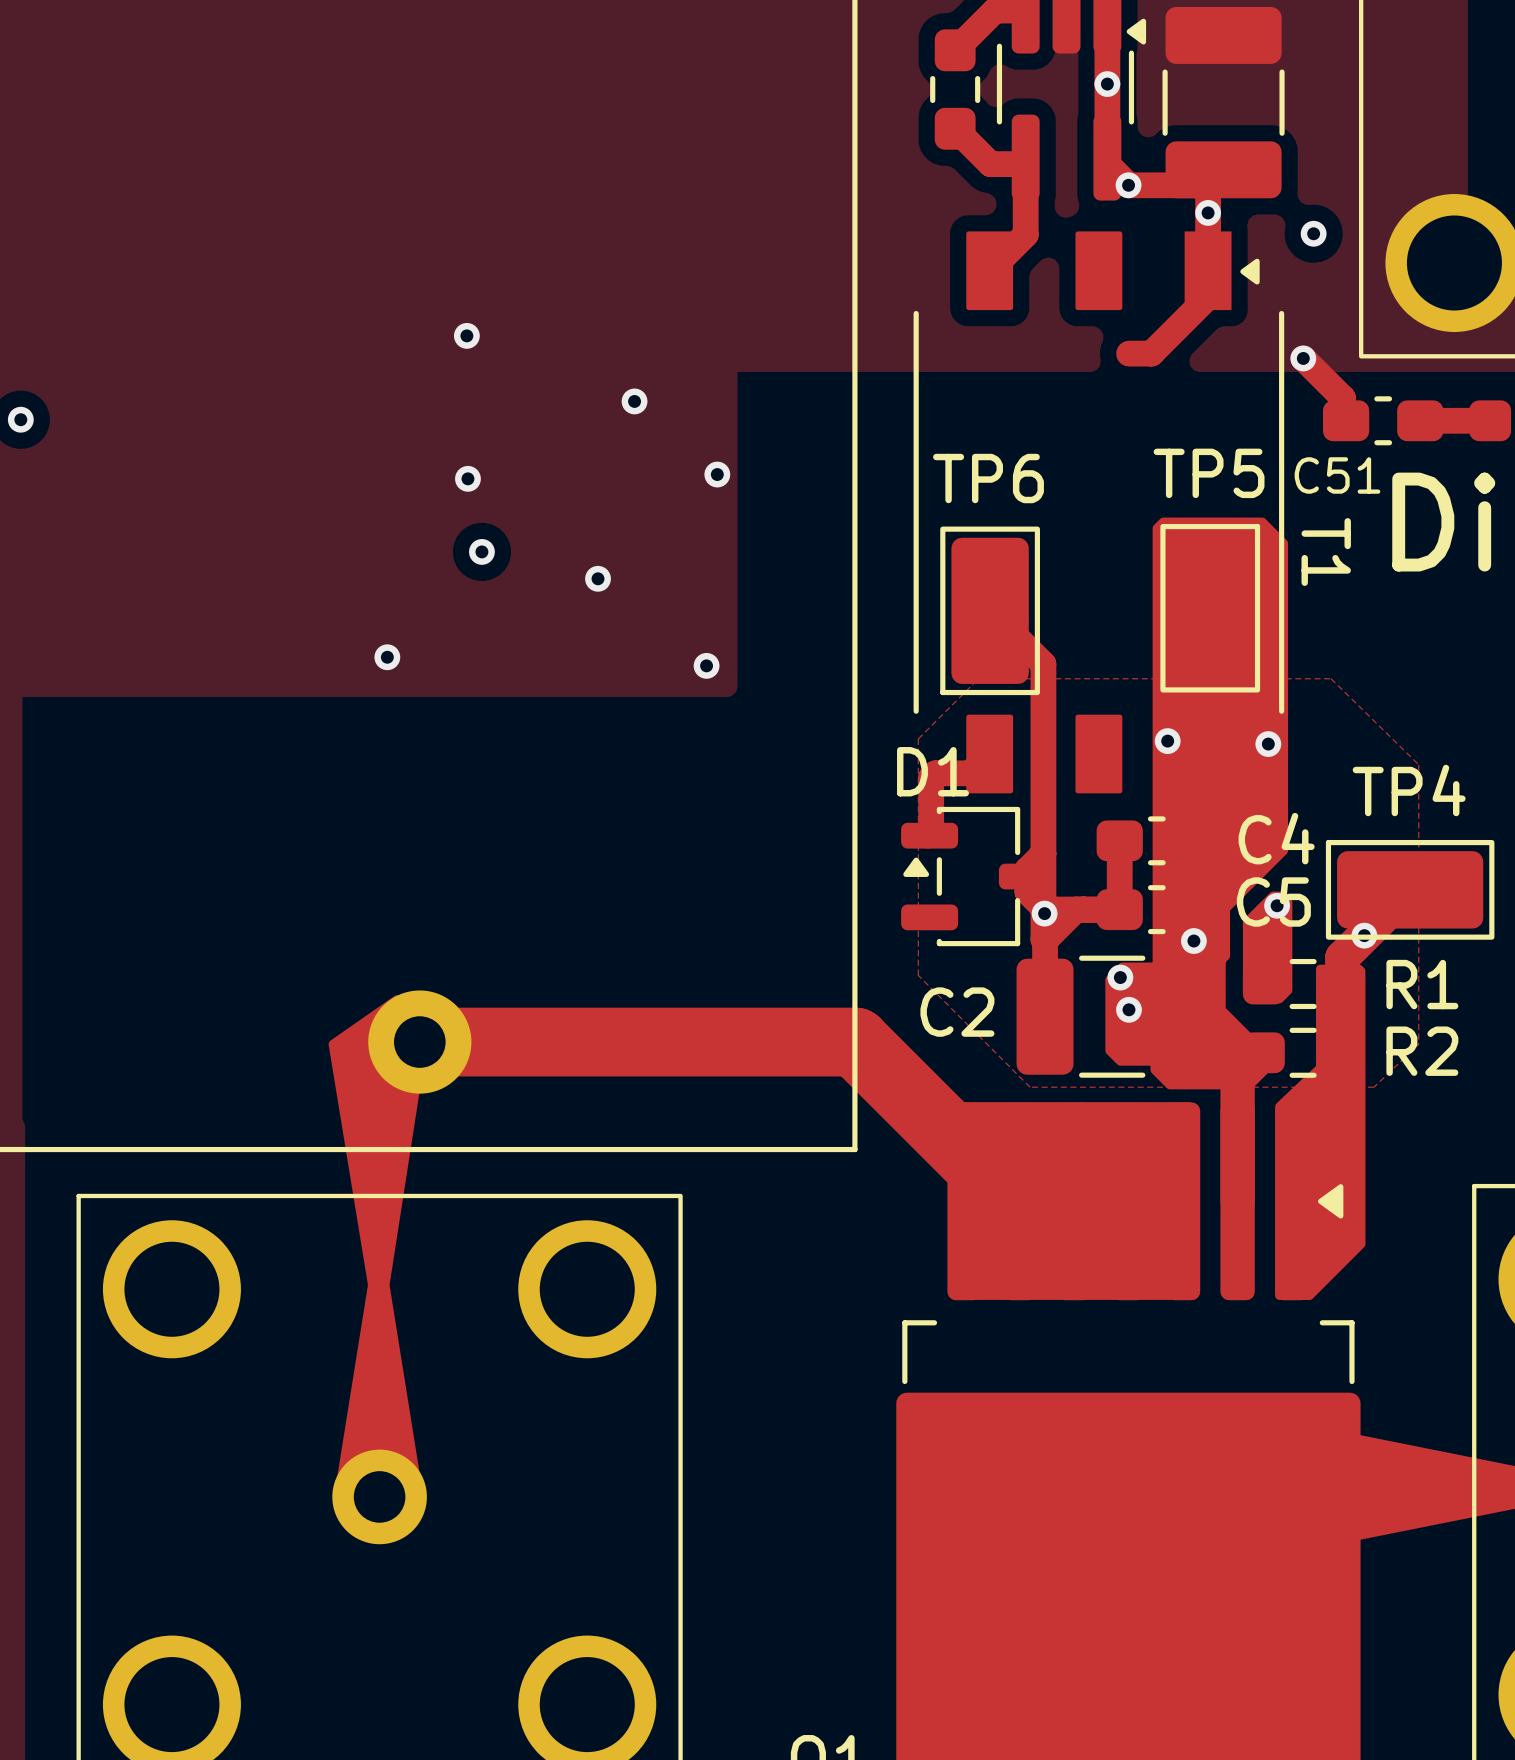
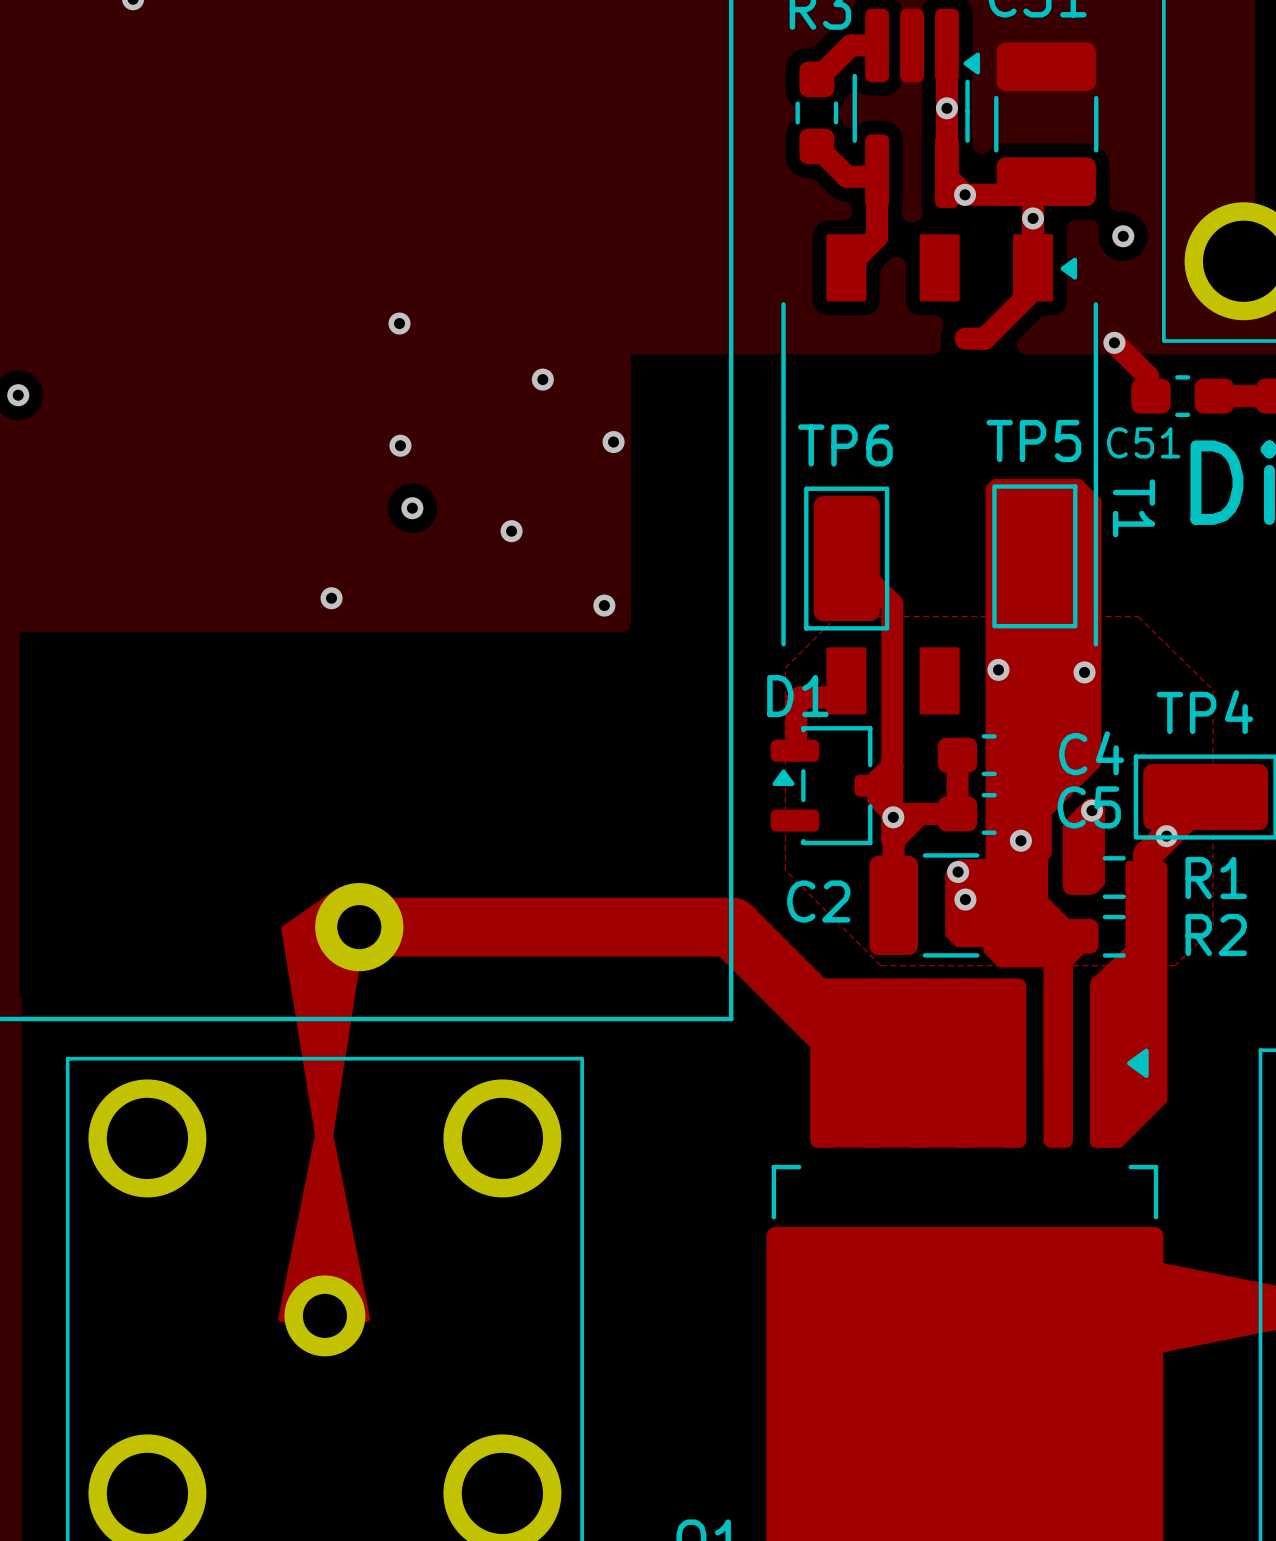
drawing shape: [328, 995, 424, 1505] -> [278, 887, 371, 1323]

